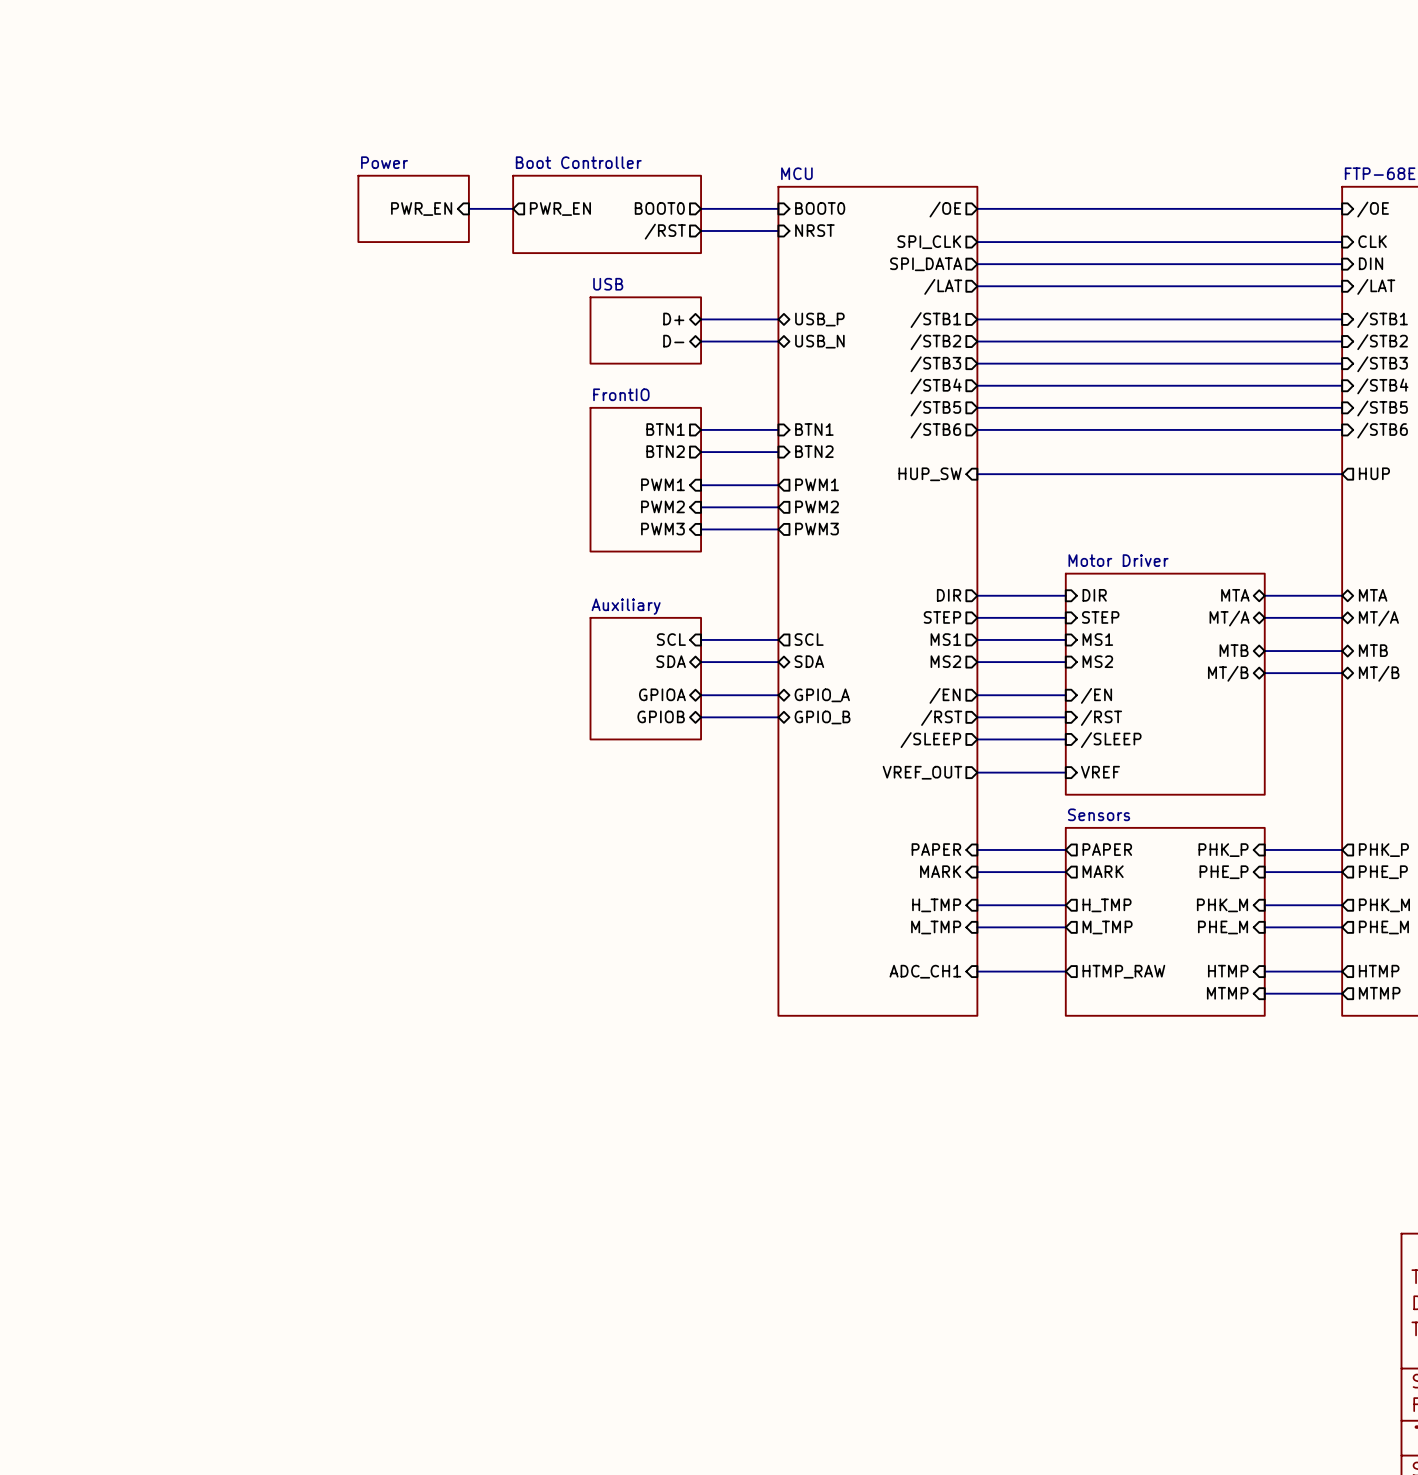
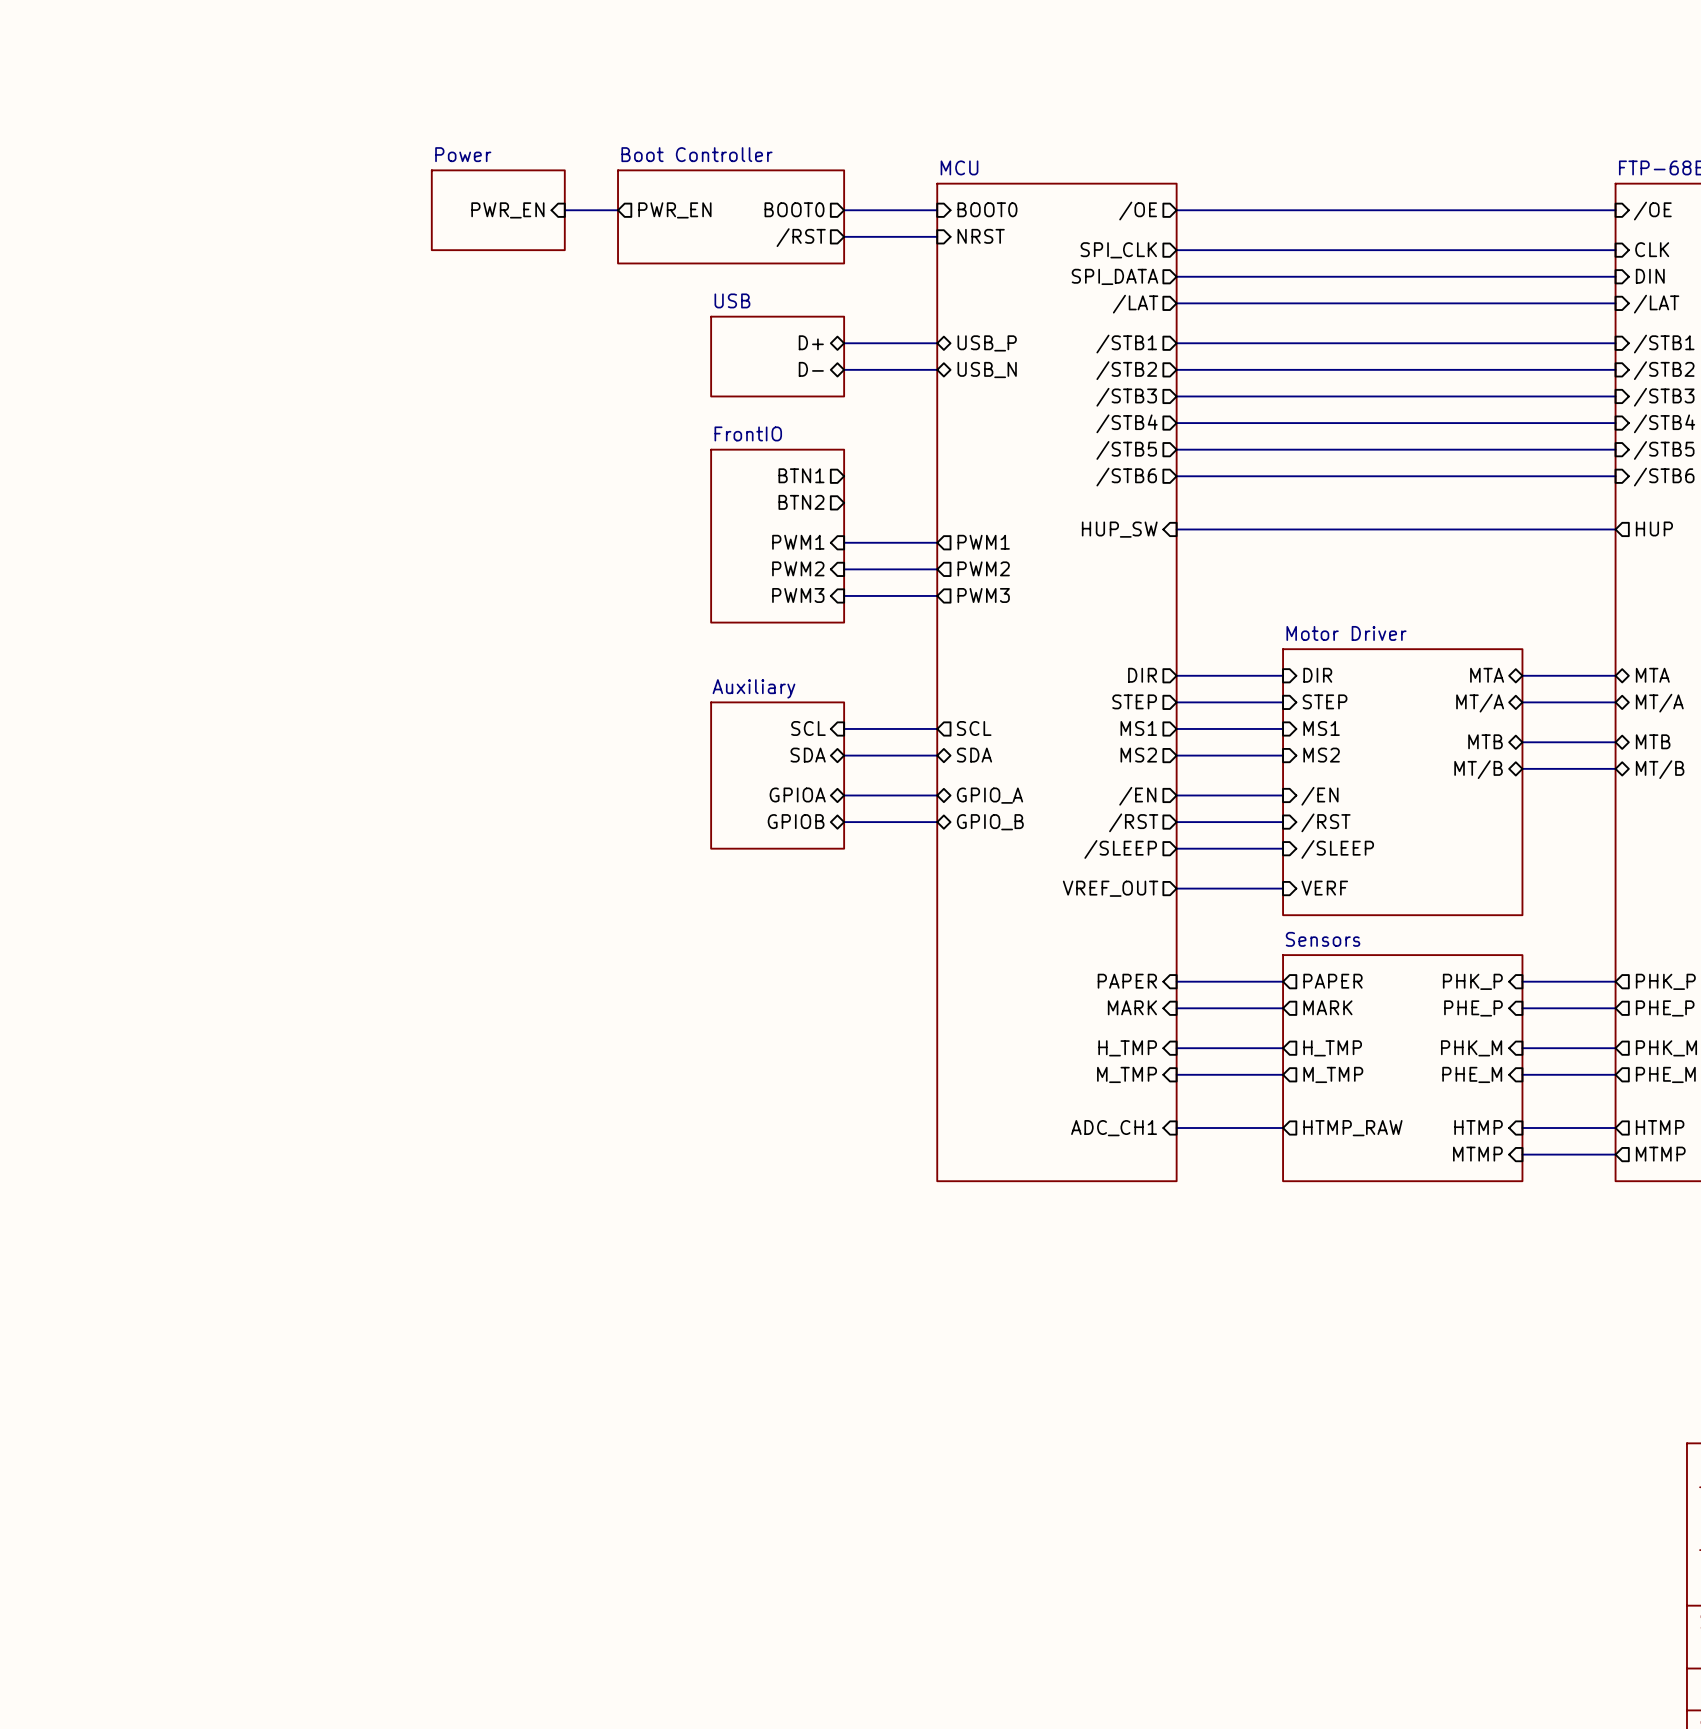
wire: (701, 429) (778, 429) -> none
sheet pin: BTN1 (814, 429) -> none
sheet pin: BTN2 (814, 451) -> none
wire: (701, 452) (778, 452) -> none
sheet pin: VREF (1100, 772) -> VERF (1324, 888)

